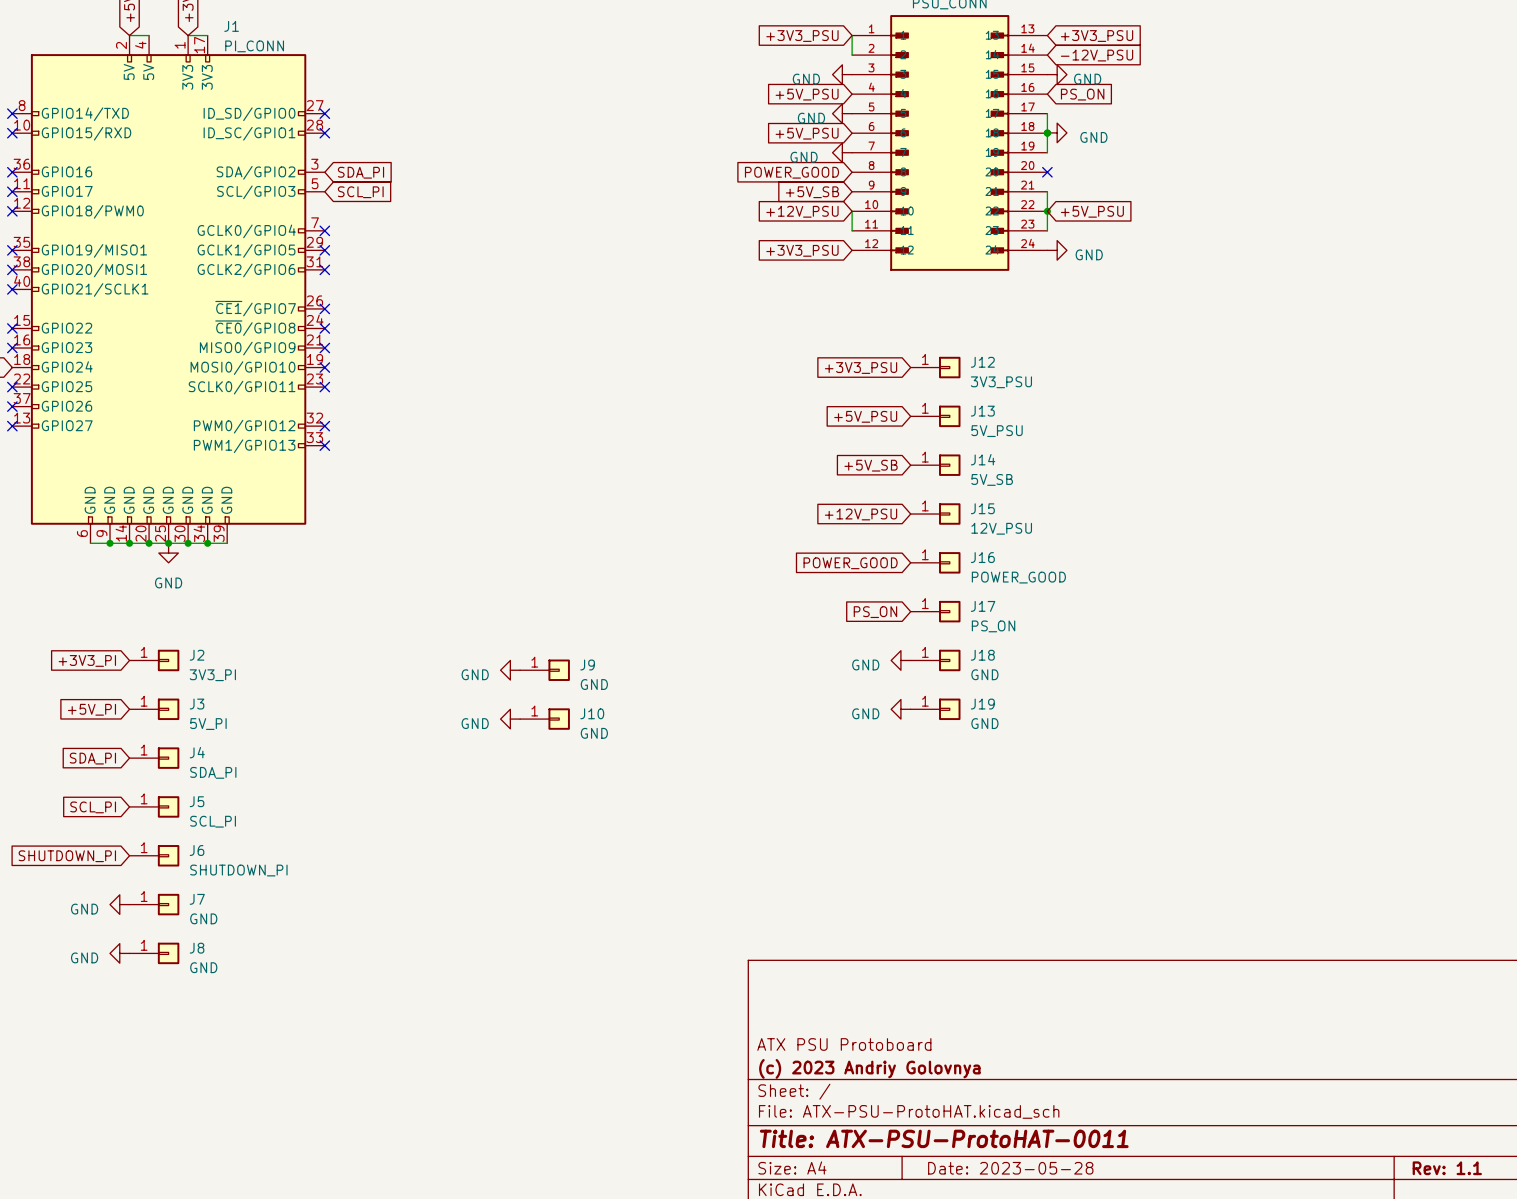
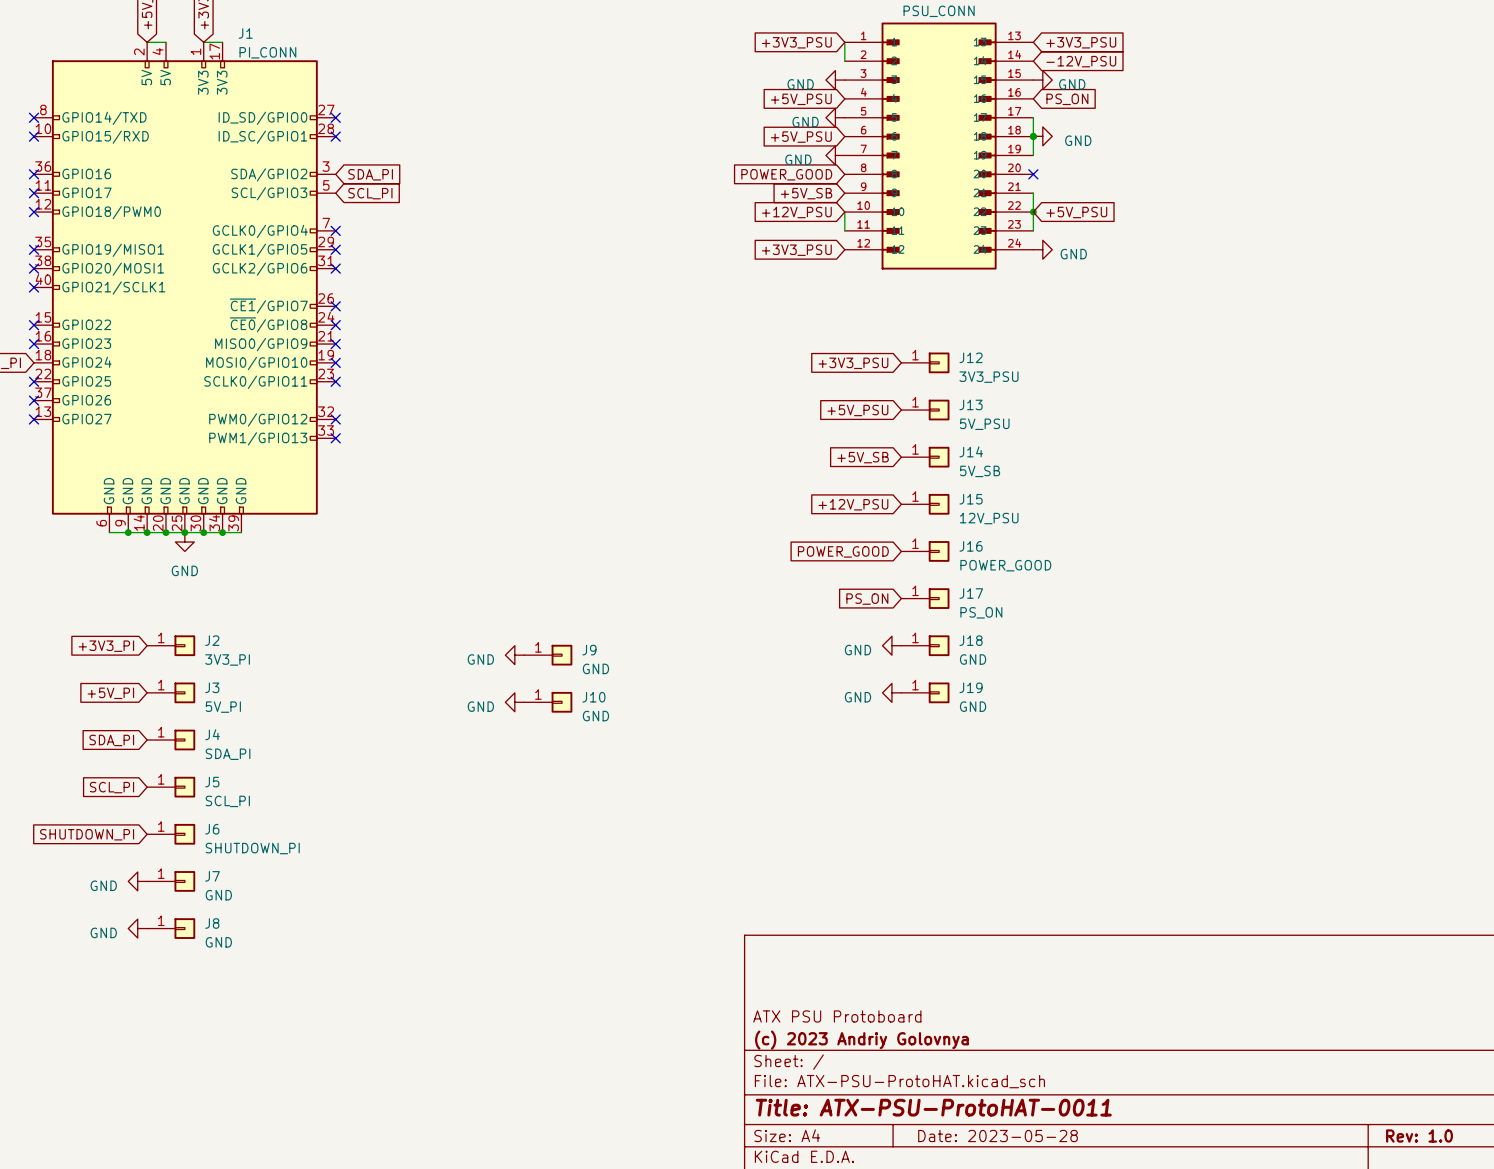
title block: Rev: 1.1 (1447, 1168) -> Rev: 1.0 (1419, 1136)

